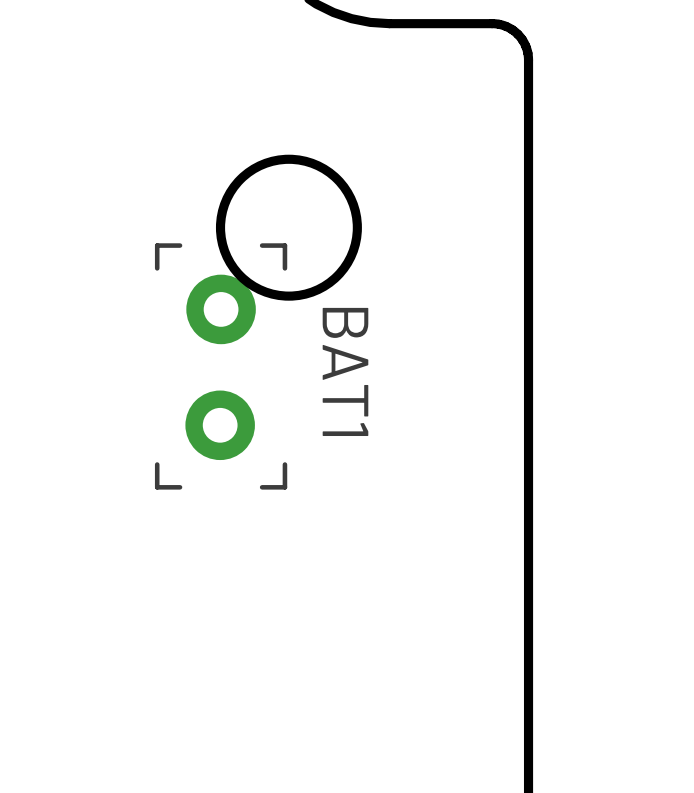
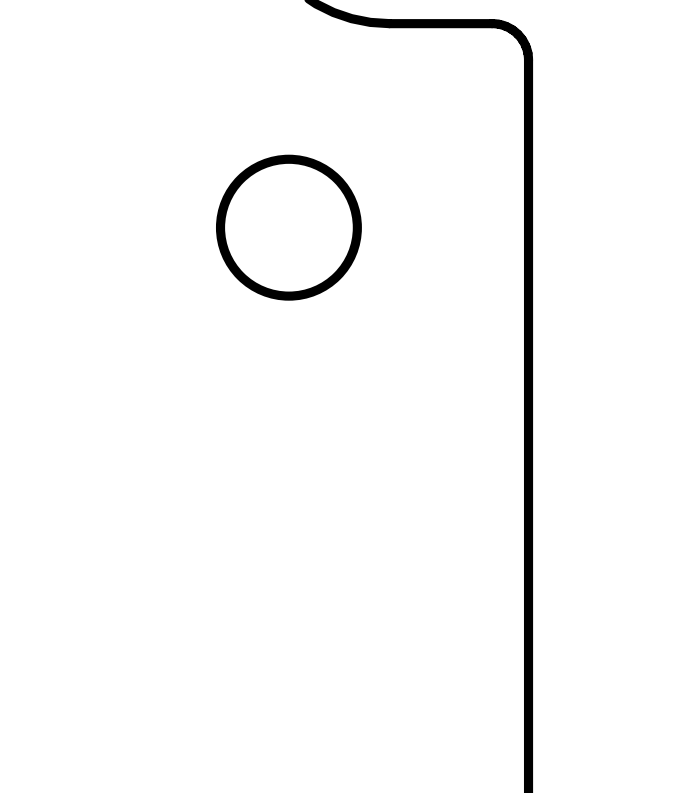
BAT1: (221, 366) -> none

